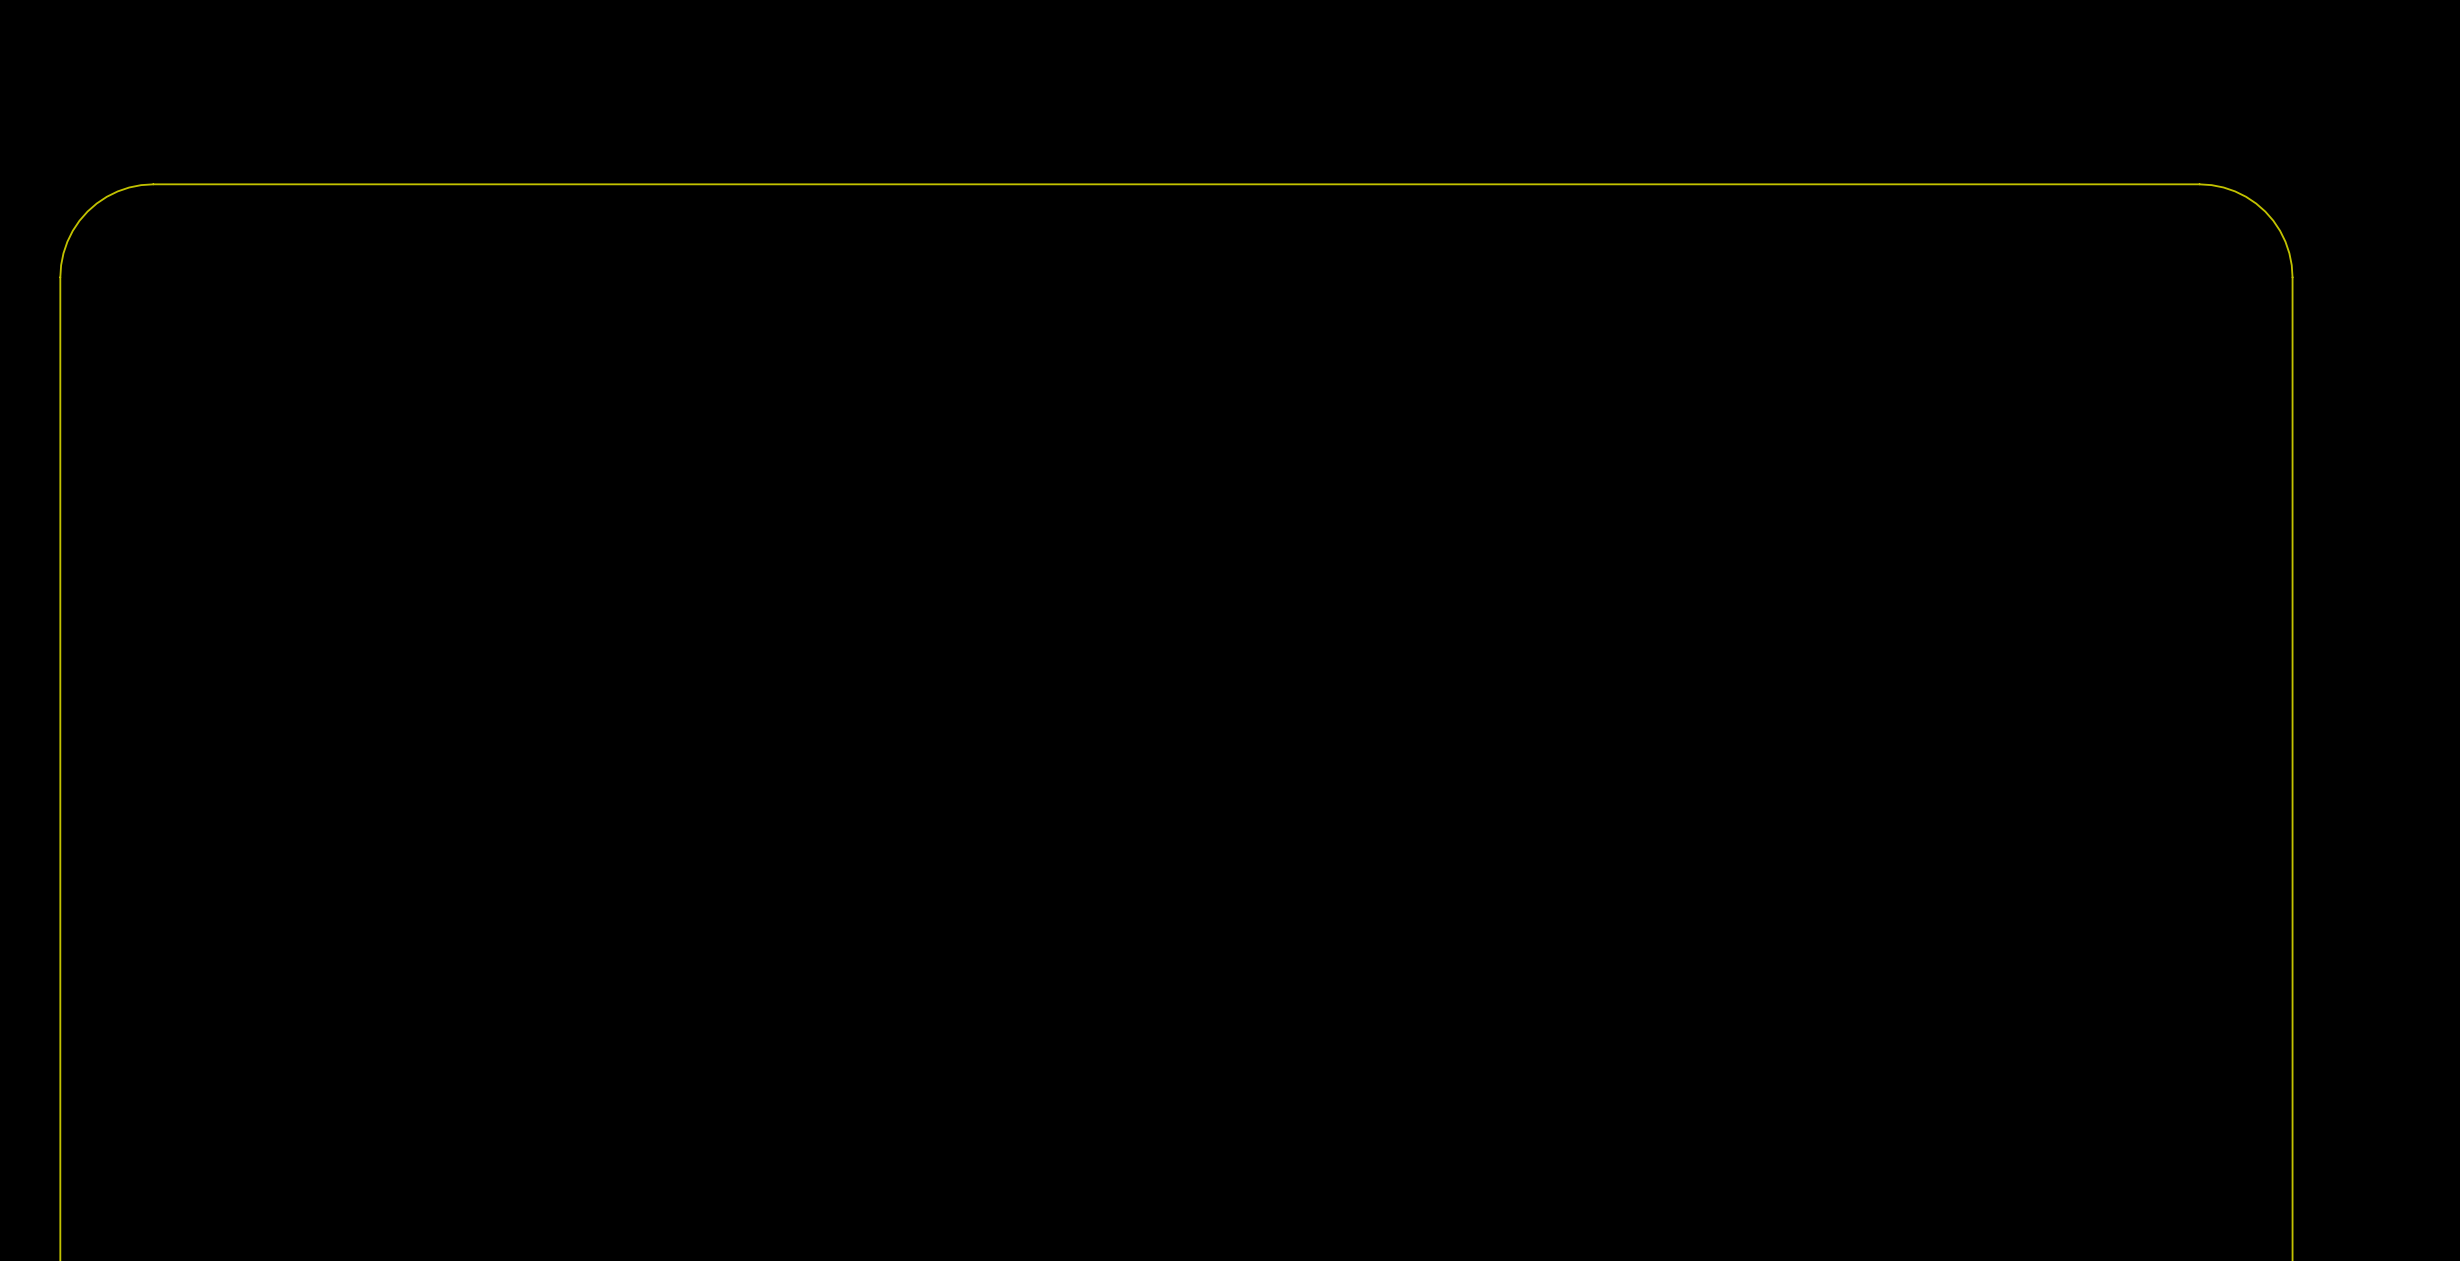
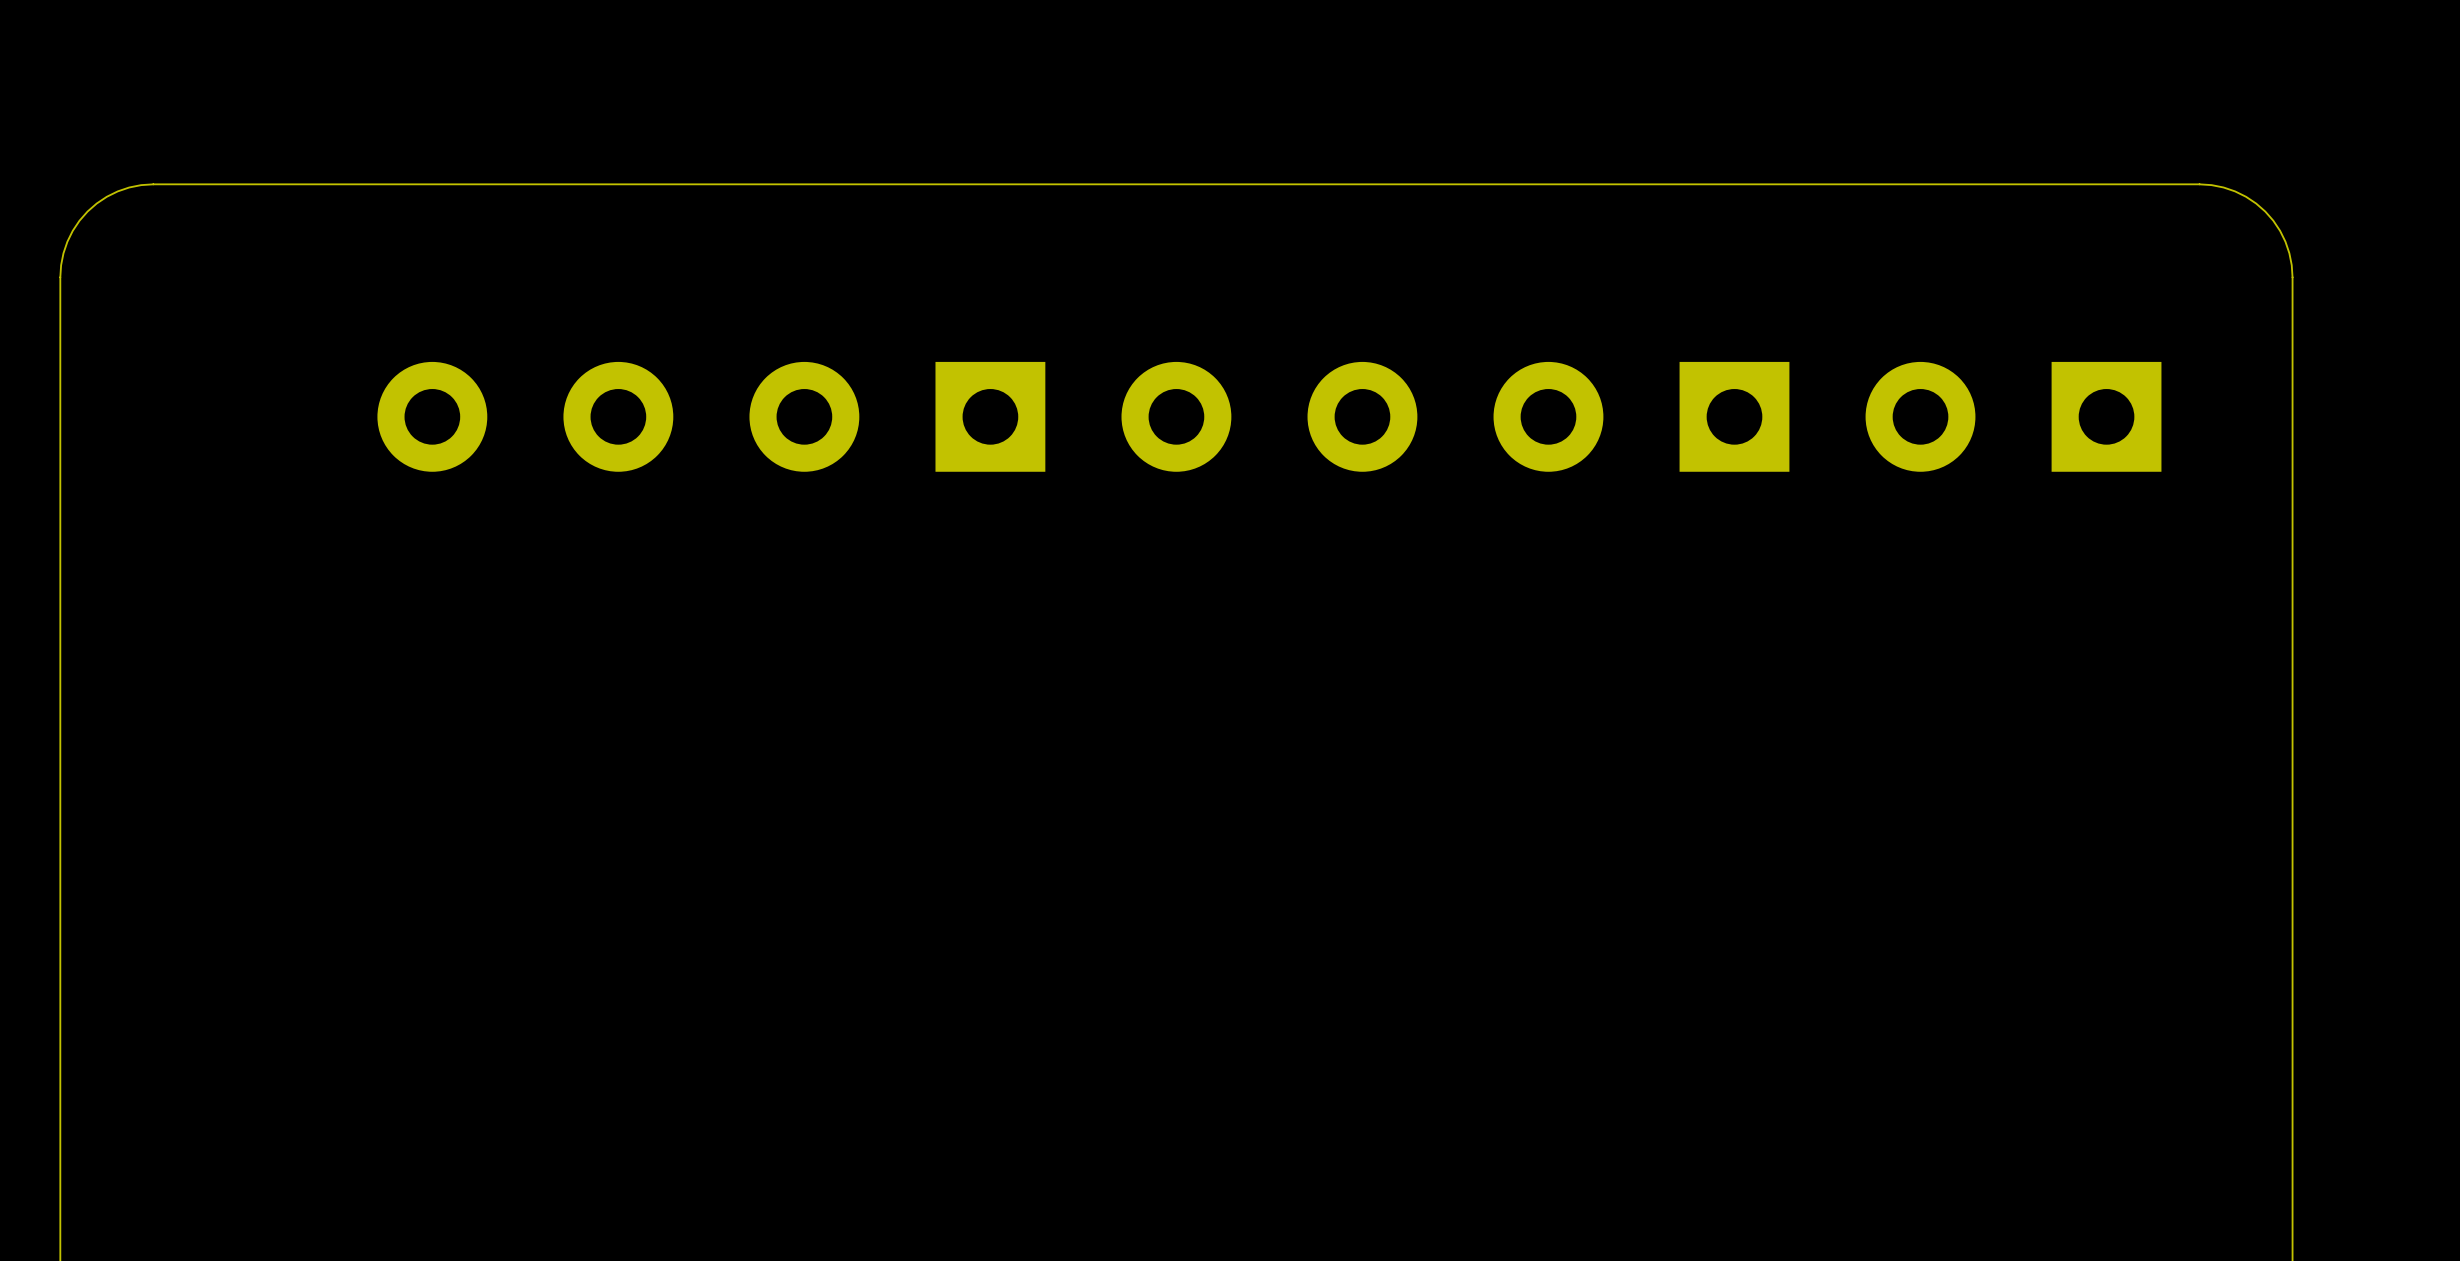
part: none -> (711, 416)
part: none -> (1455, 416)
part: none -> (2013, 416)

